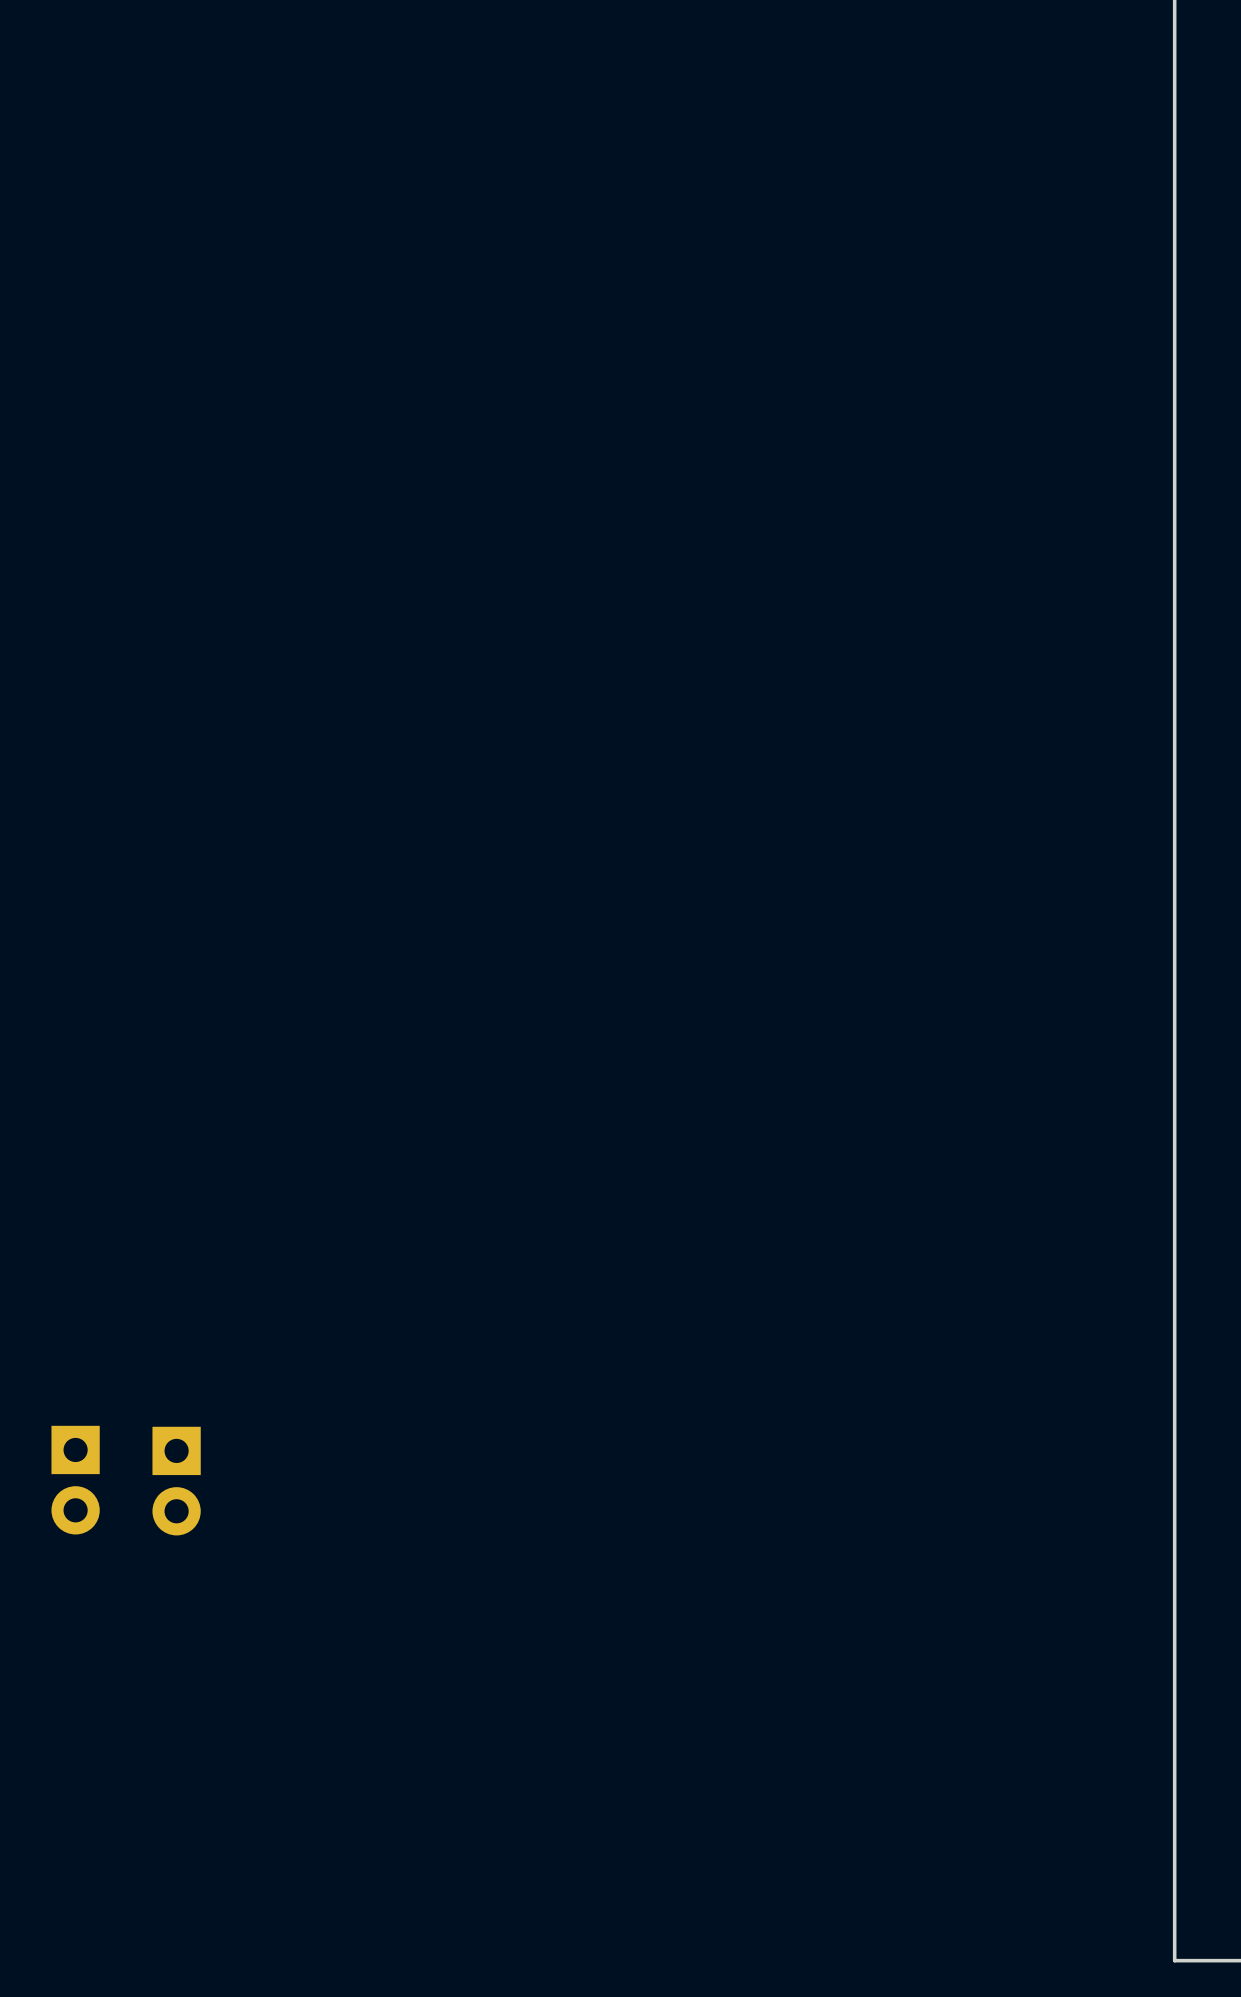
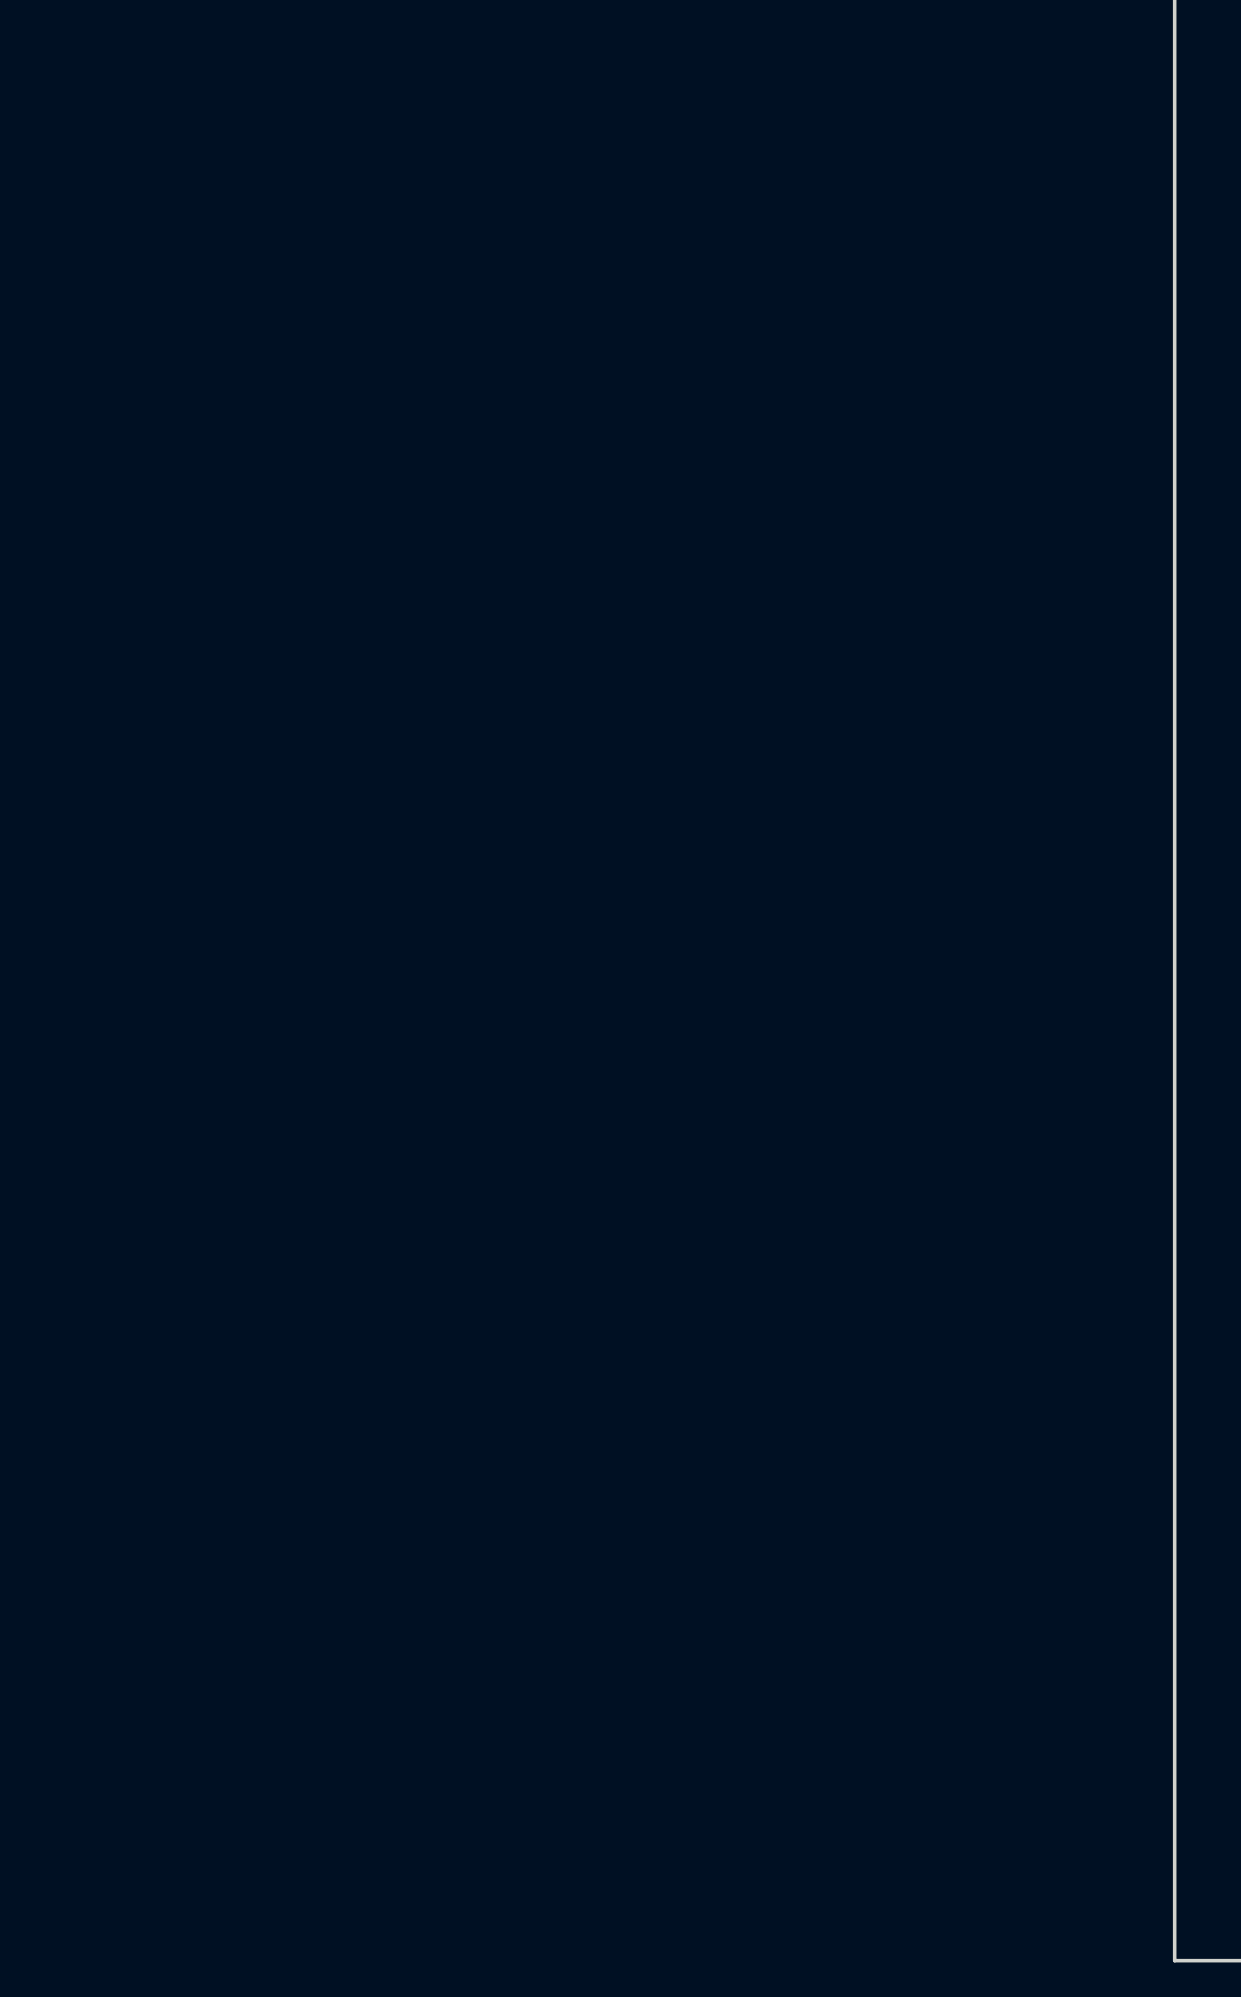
part: (75, 1480) -> none
part: (176, 1481) -> none

